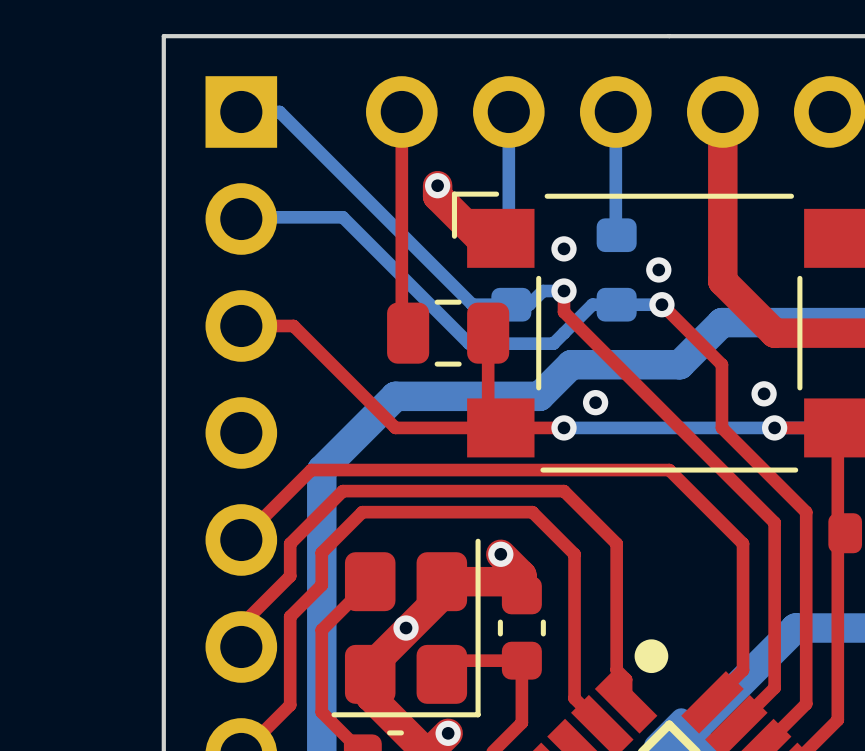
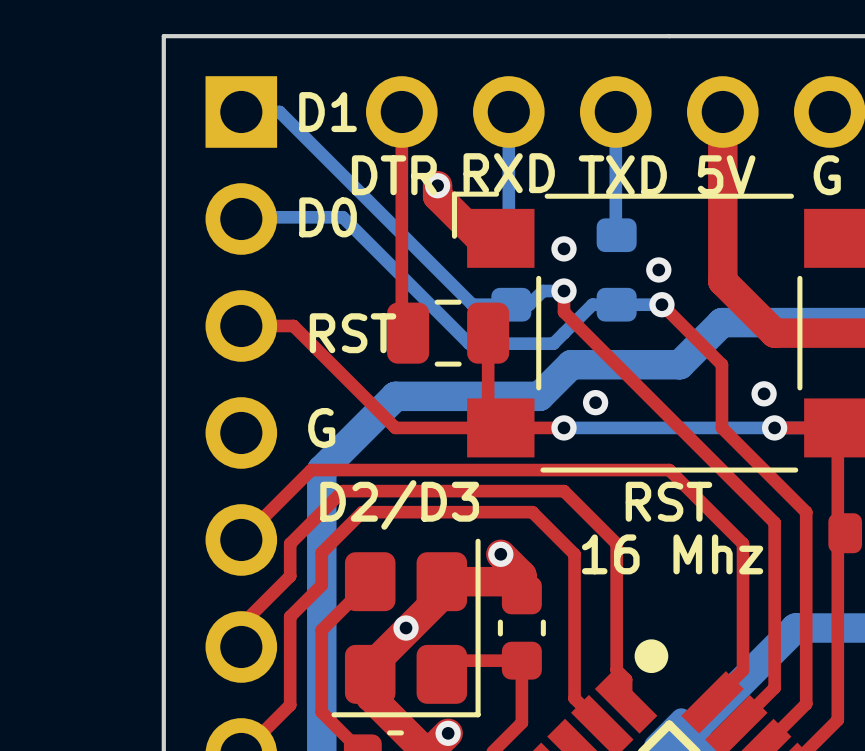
text: none -> D1 (328, 112)
text: none -> RXD (509, 173)
text: none -> DTR (394, 175)
text: none -> TXD (622, 175)
text: none -> 5V (726, 175)
text: none -> G (827, 175)
text: none -> D0 (328, 217)
text: none -> RST (353, 333)
text: none -> G (321, 428)
text: none -> RST (668, 501)
text: none -> D2/D3 (399, 504)
text: none -> 16 Mhz (672, 554)

